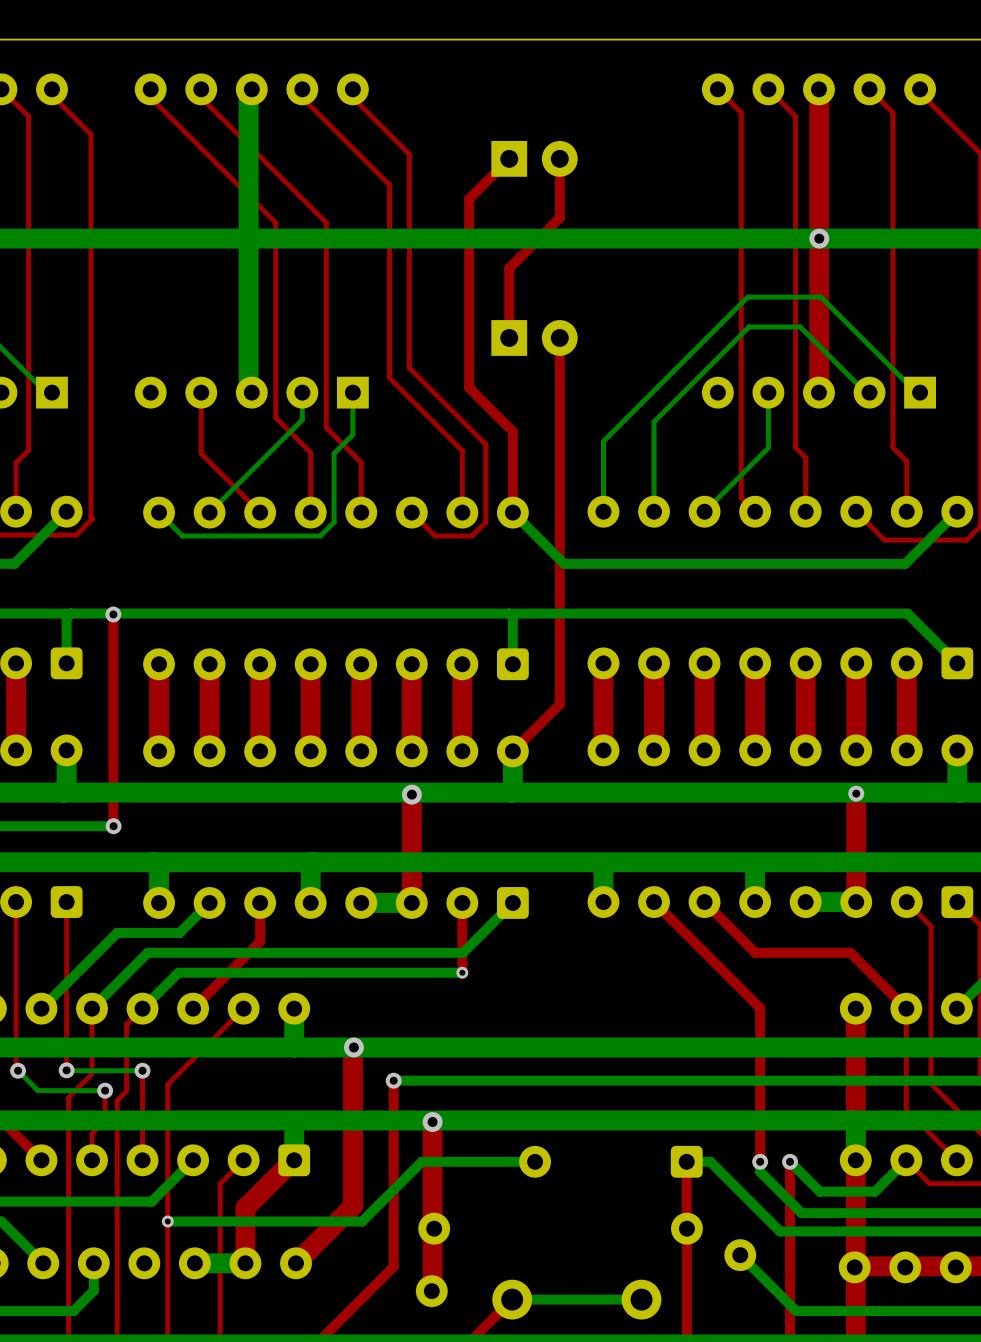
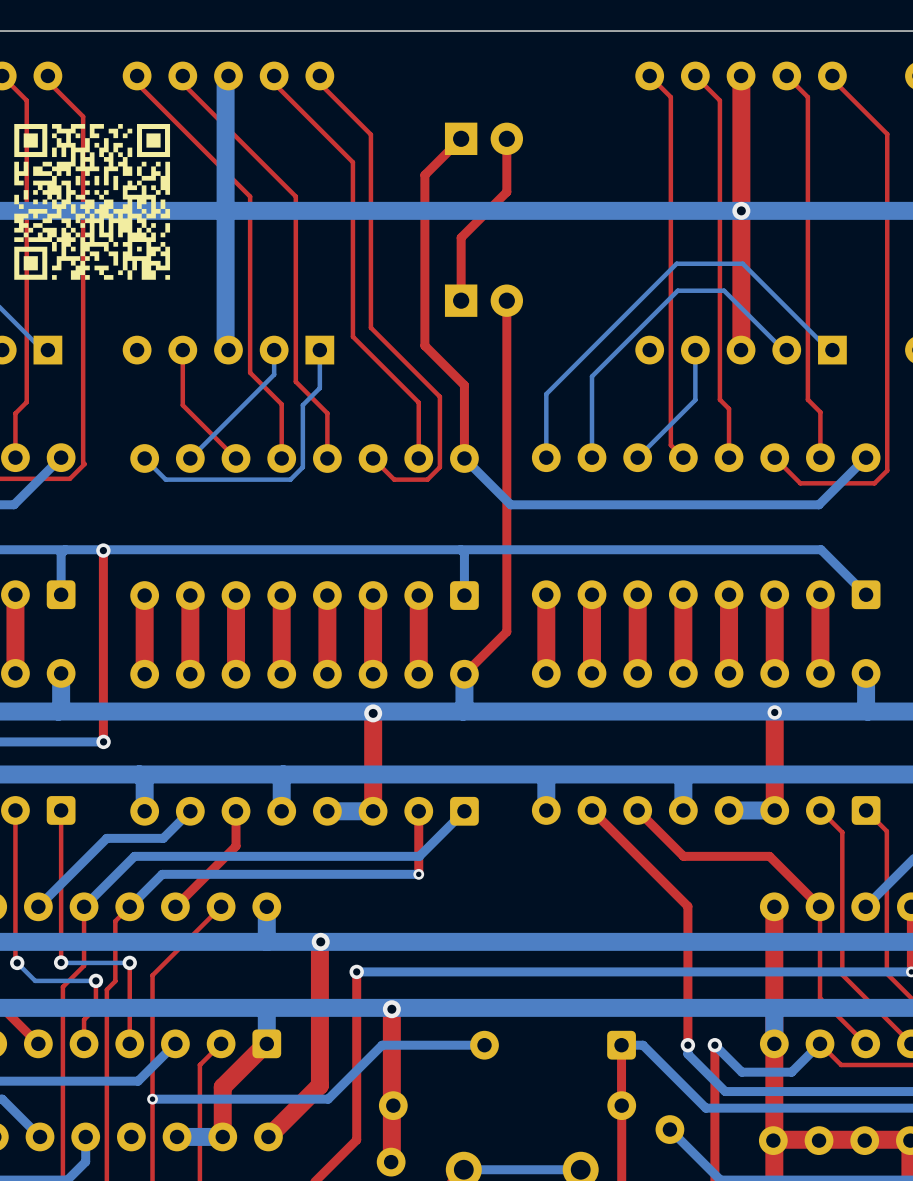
drawing: none -> [14, 123, 171, 280]

